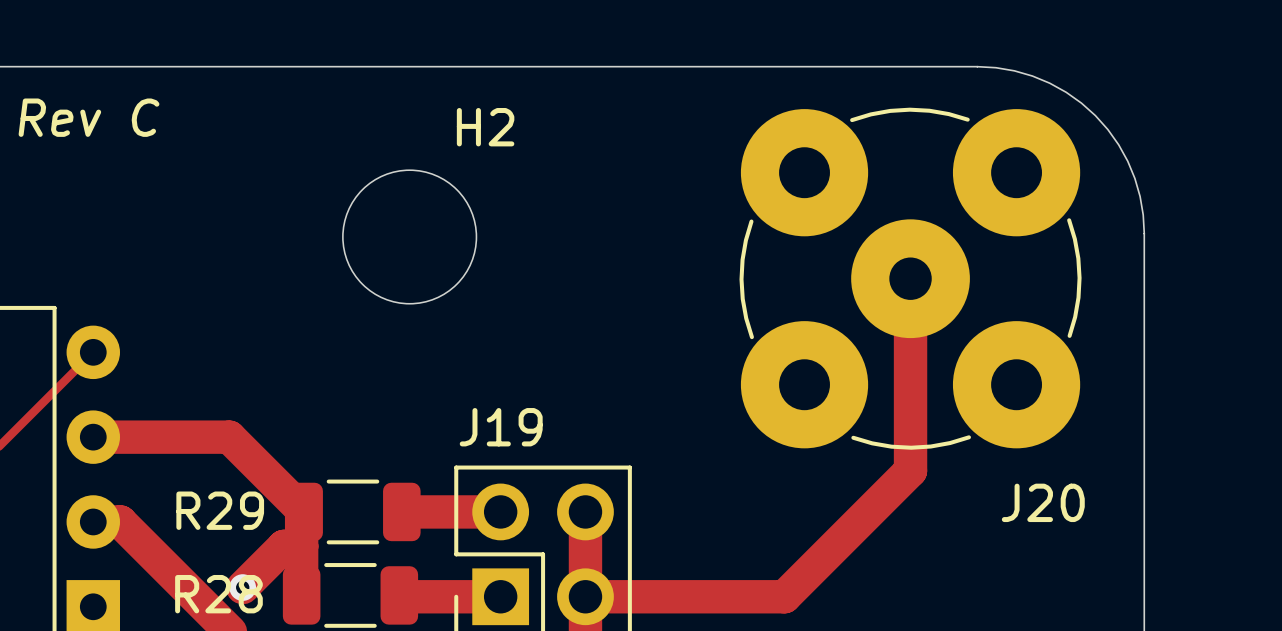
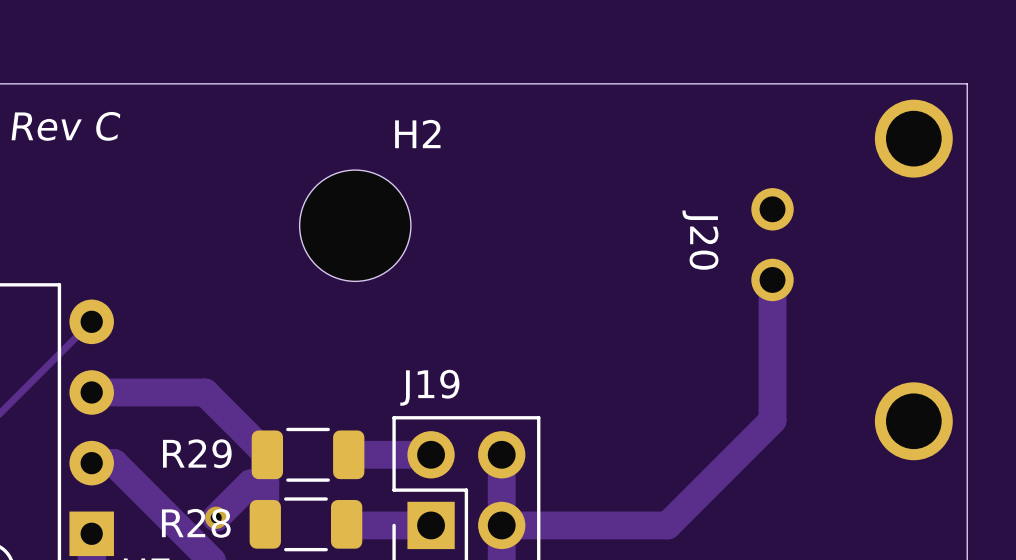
board edge: (977, 66) (1014, 70) (1049, 83) (1081, 103) (1095, 115) (1107, 129) (1127, 161) (1140, 196) (1144, 233) -> (828, 83) (967, 83) (967, 222)
J20 footprint: [739, 107, 1082, 450] -> [751, 99, 953, 461]
J20 name position: J20 (1043, 502) -> J20 (700, 240)

